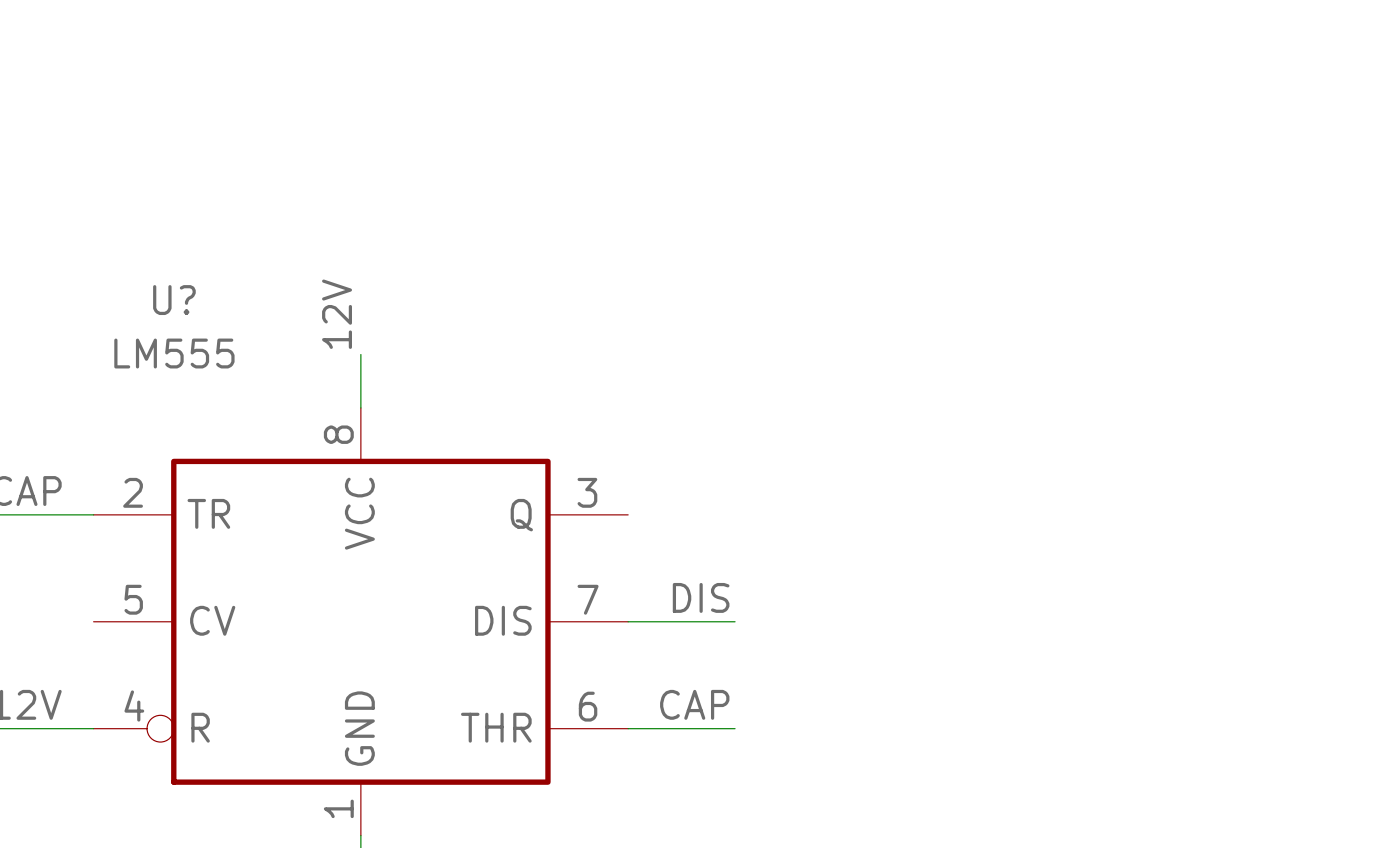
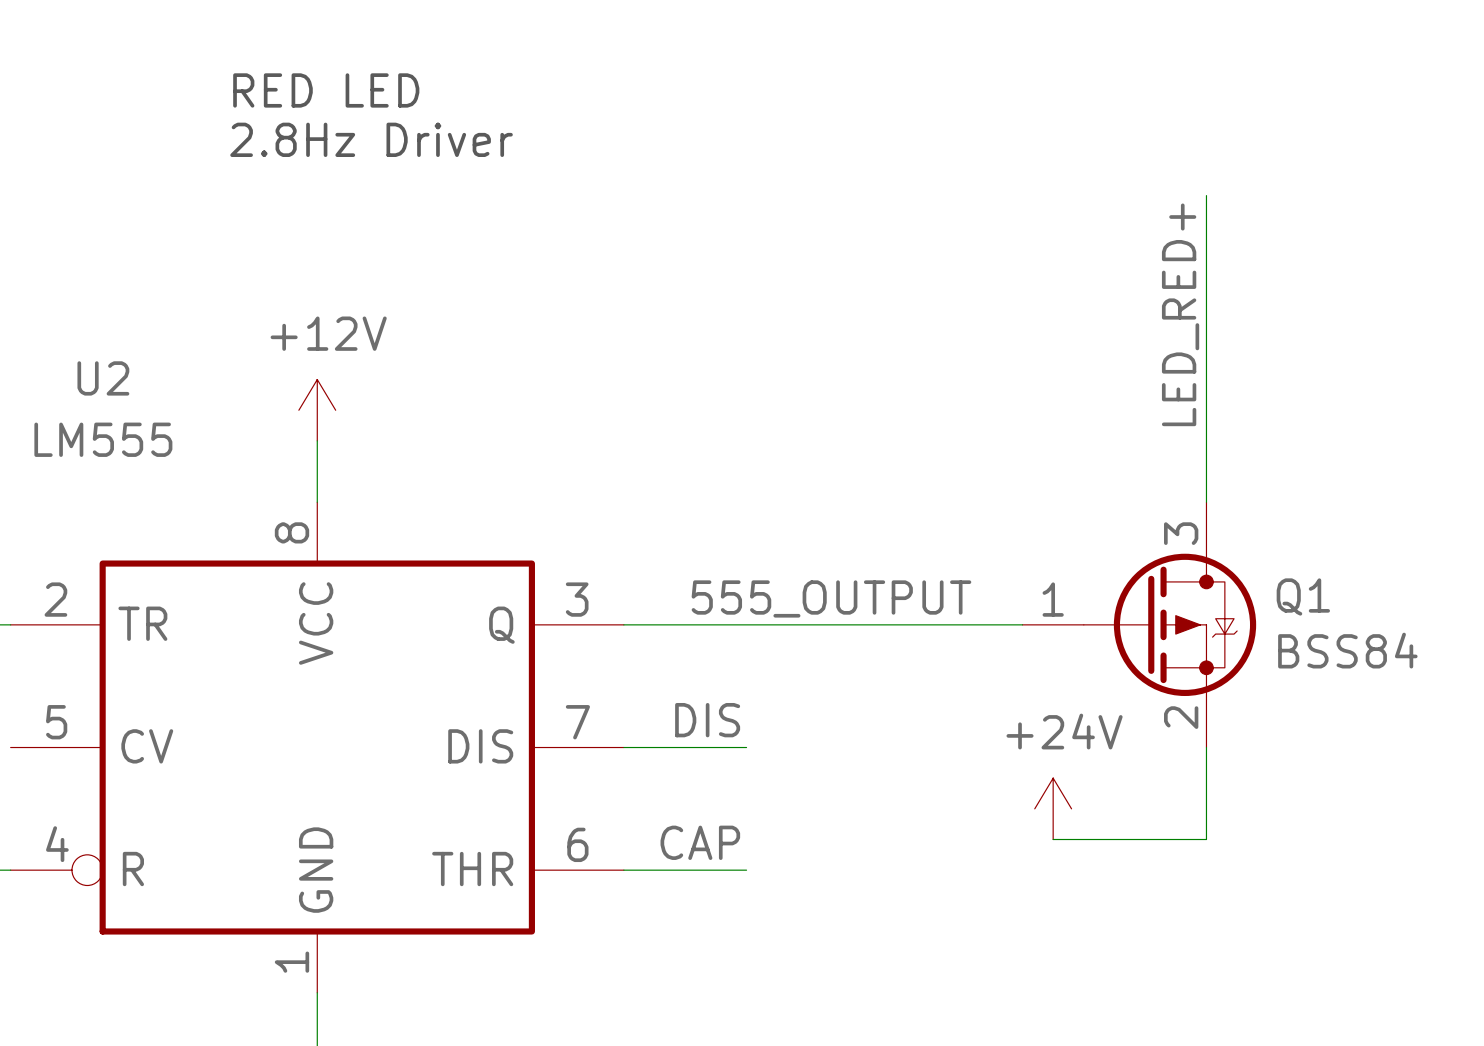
text: none -> RED LED (326, 90)
text: none -> 2.8Hz Driver (371, 139)
wire: none -> (1206, 195) (1206, 502)
label: none -> LED_RED+ (1180, 314)
U? name: U? (174, 300) -> U2 (103, 378)
label: 12V (337, 314) -> none
power symbol: none -> +12V (317, 410)
label: none -> 555_OUTPUT (831, 598)
wire: none -> (623, 624) (1022, 624)
Q1: none -> BSS84 (1139, 624)
wire: none -> (1206, 747) (1206, 839) (1053, 839)
power symbol: none -> +24V (1053, 808)

